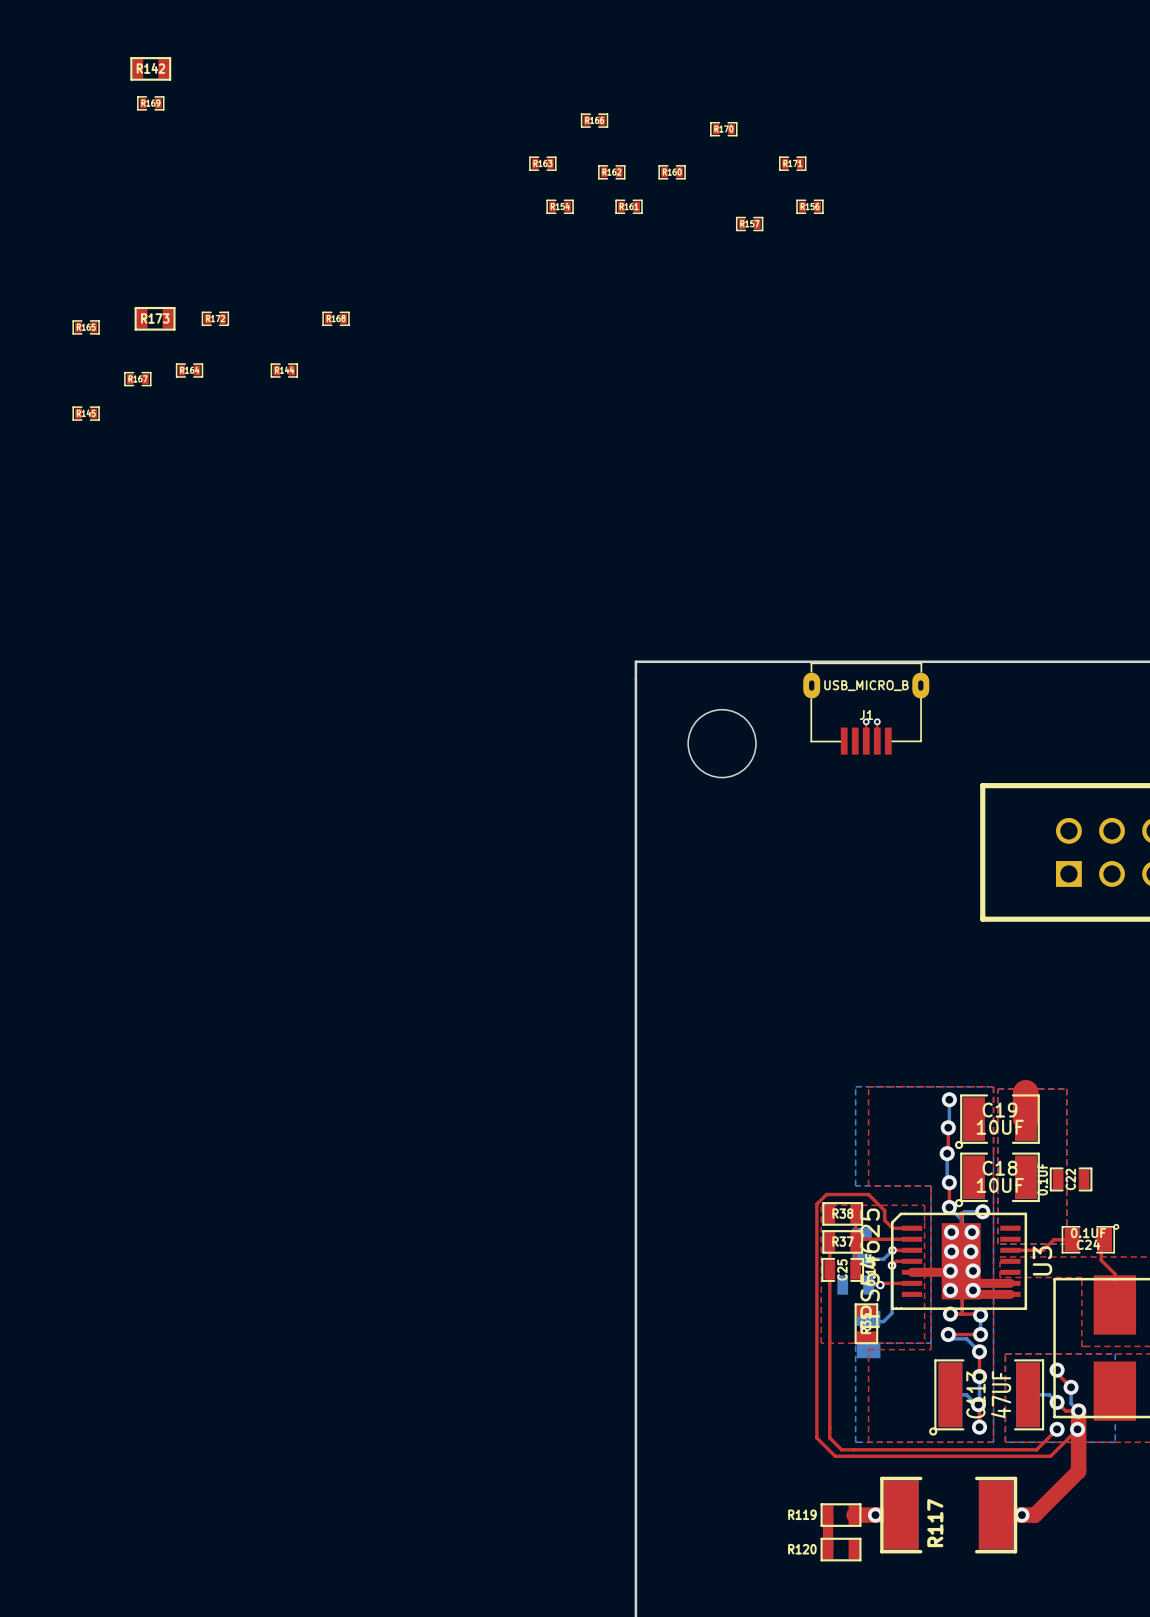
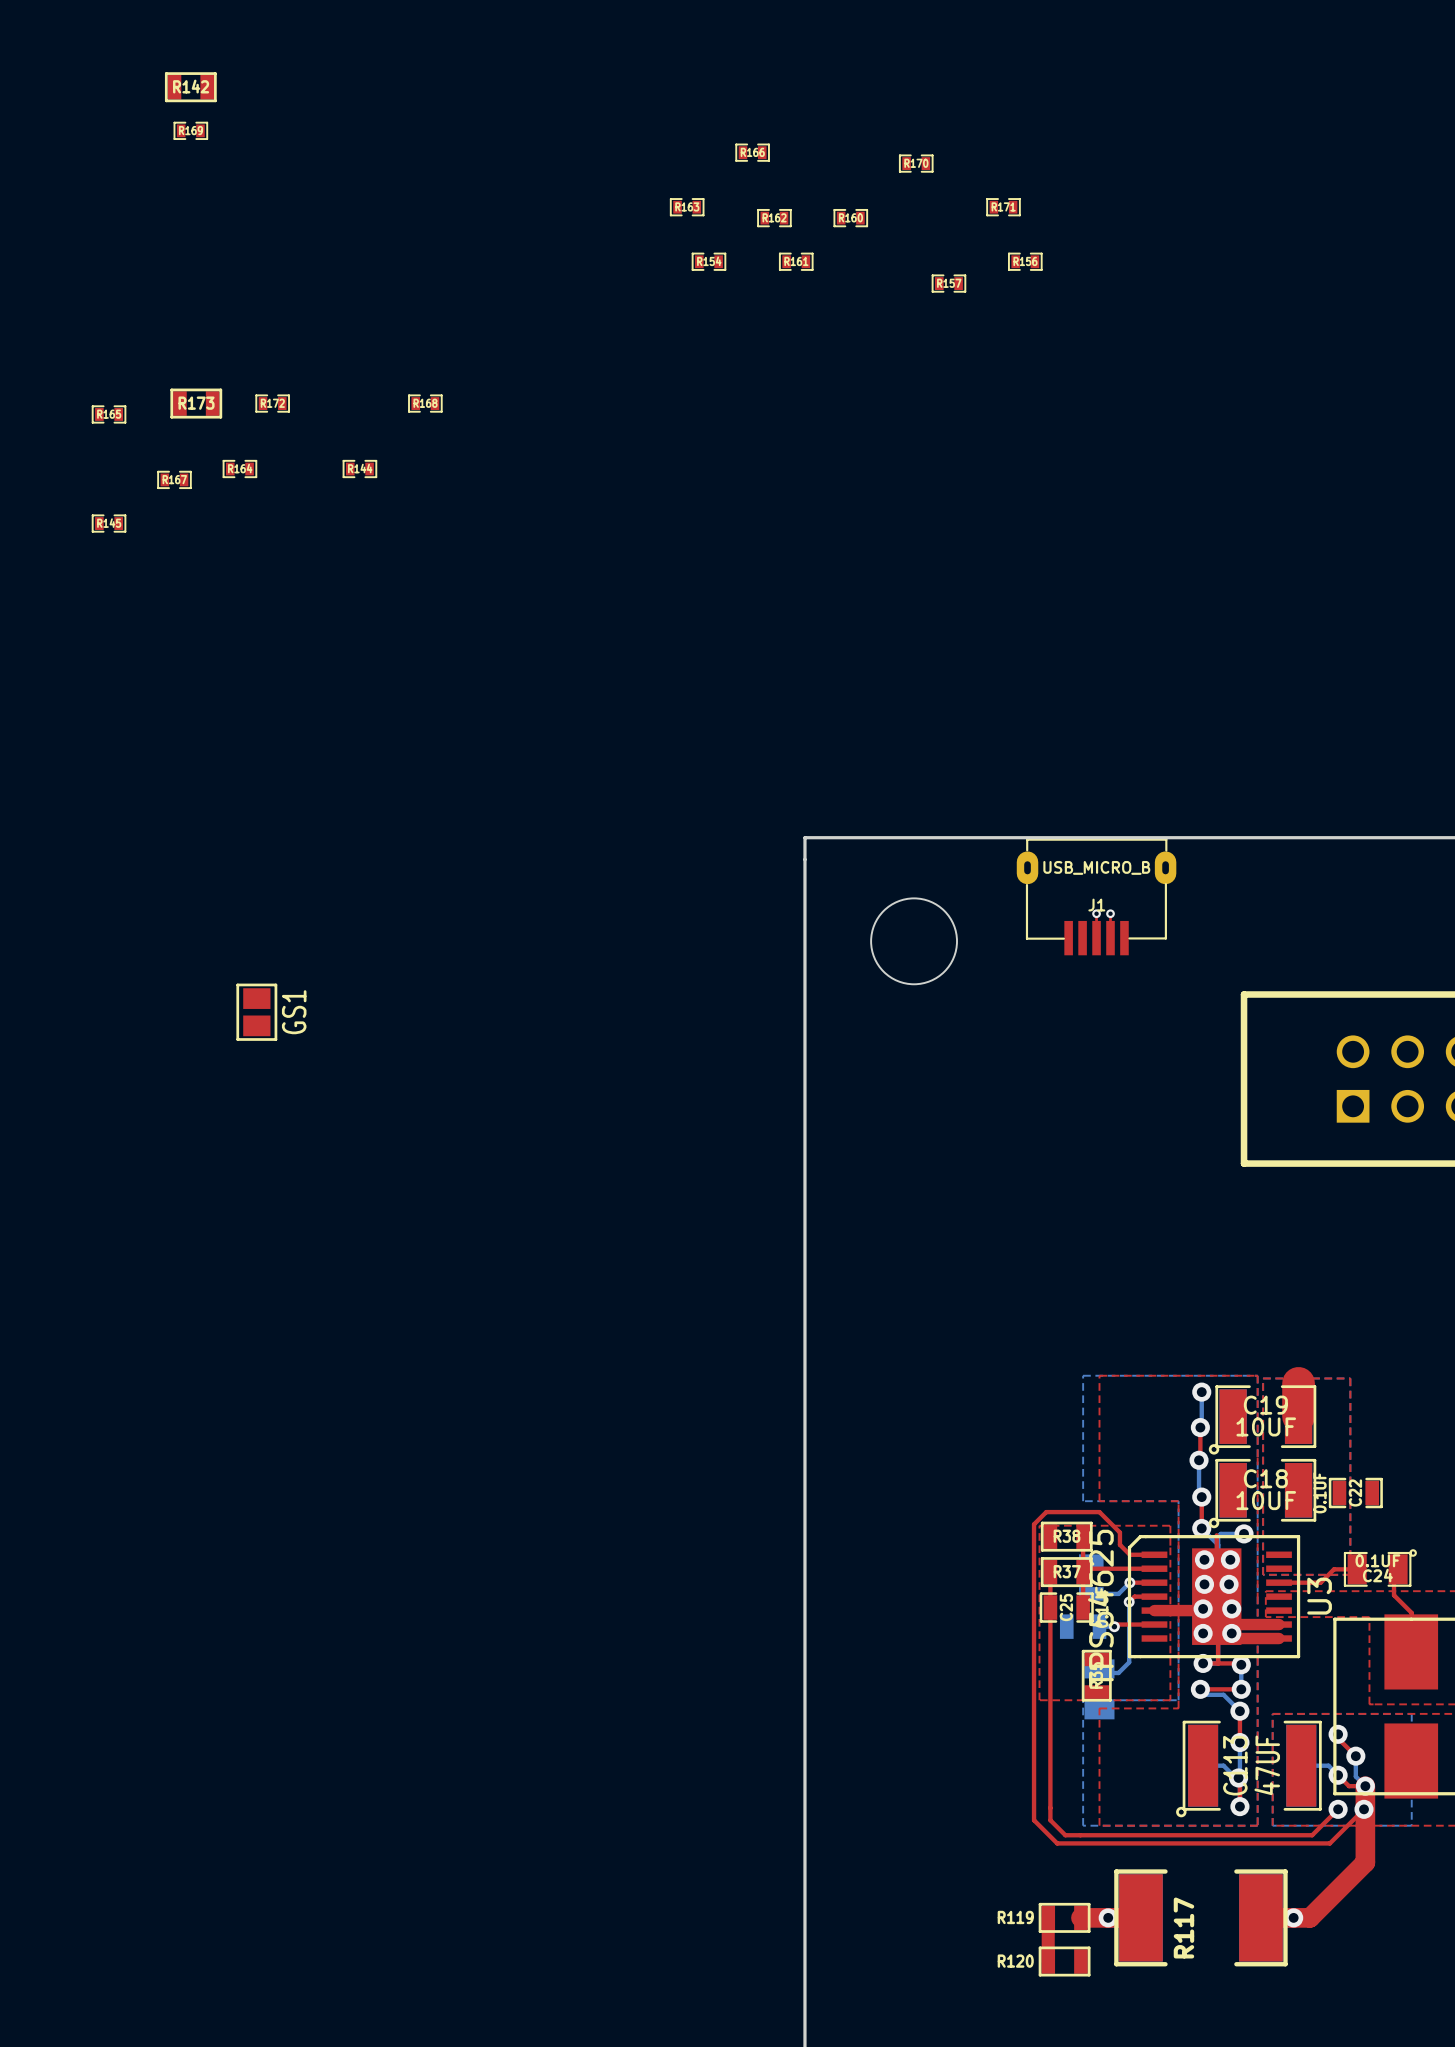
GS1: none -> (256, 1012)

